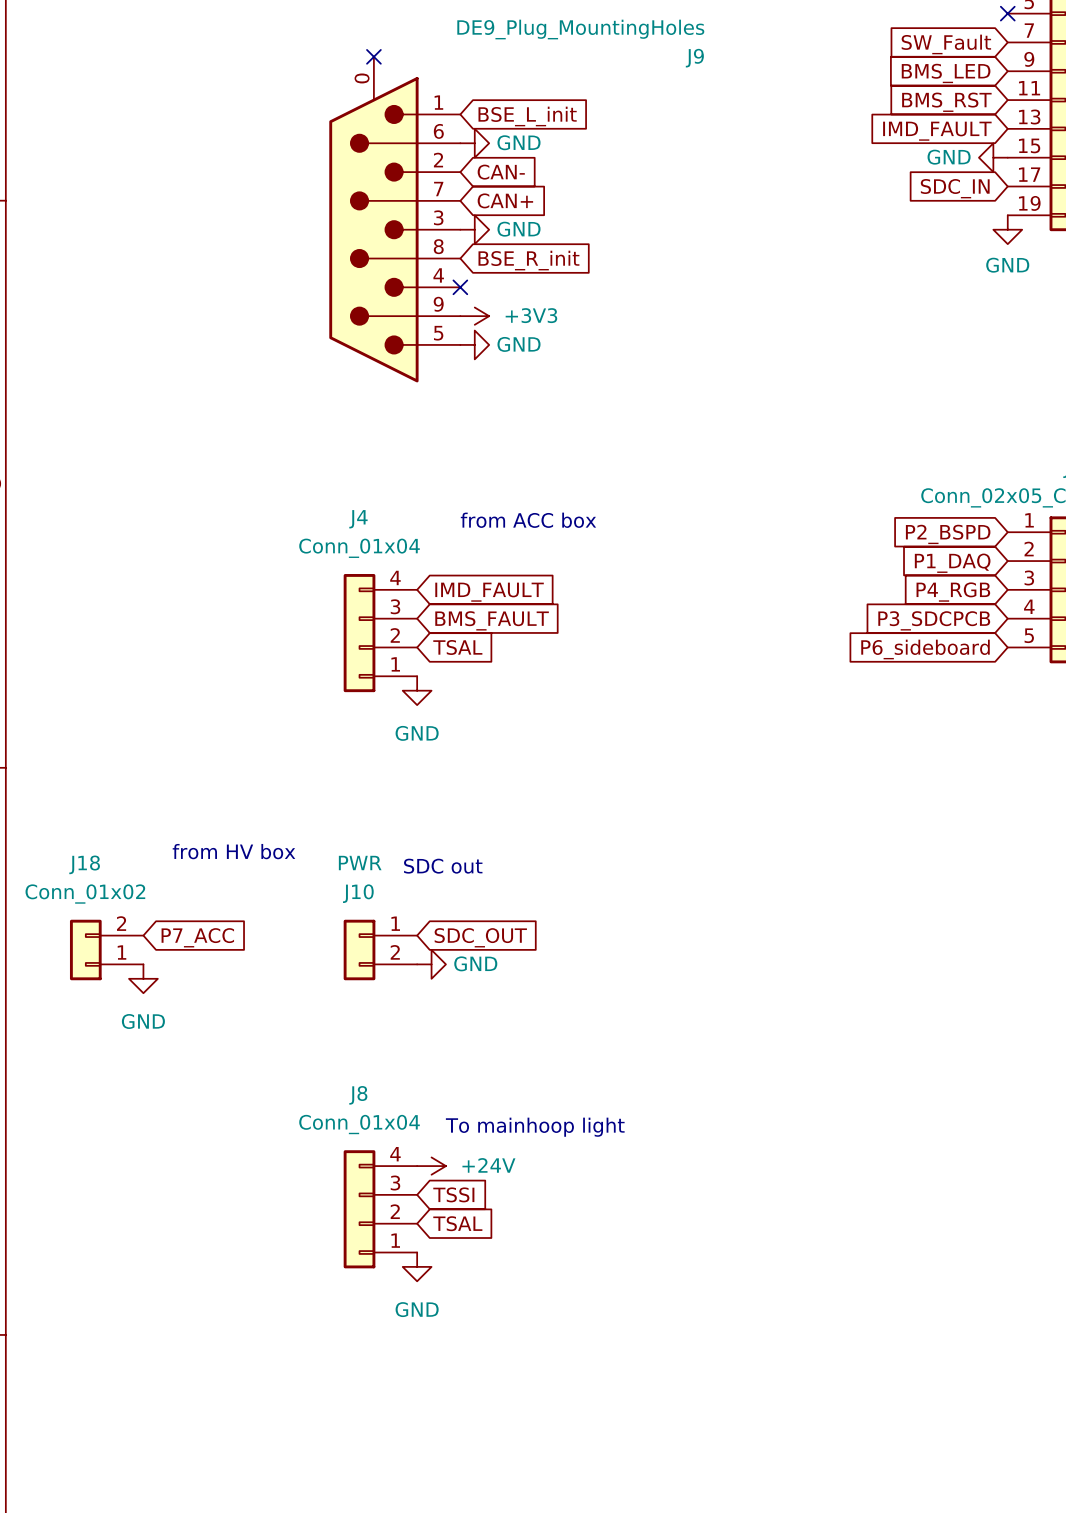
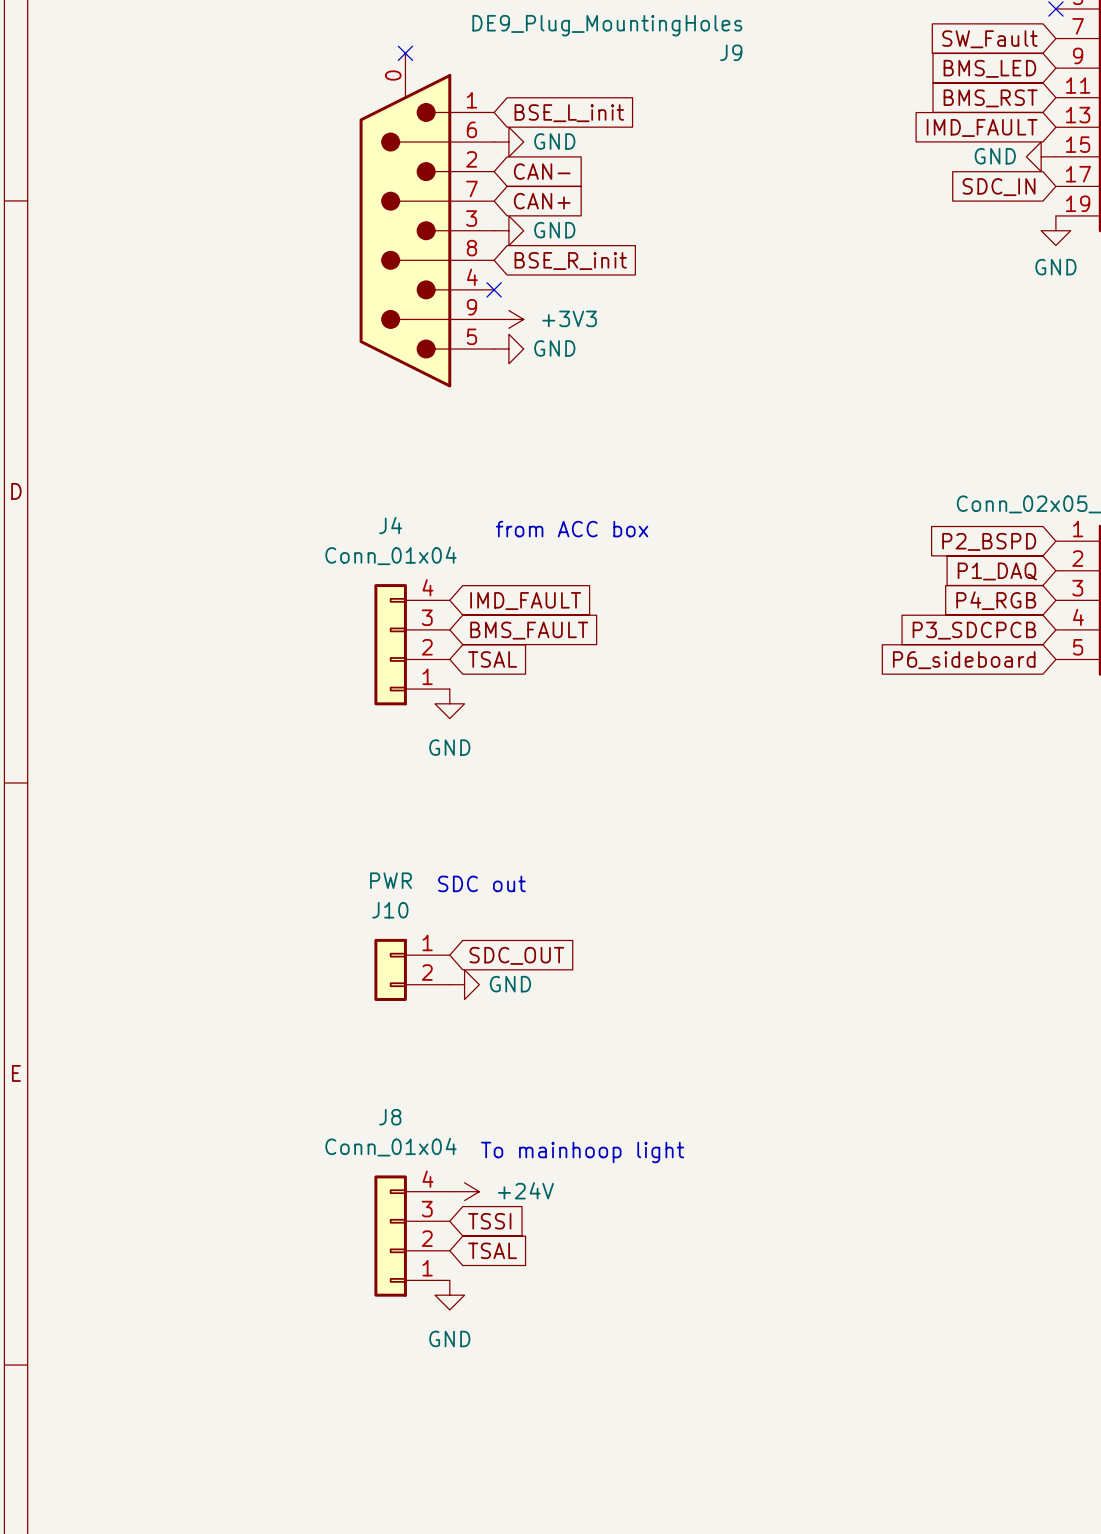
text: from HV box (233, 851) -> none
global label: P7_ACC (197, 937) -> none
J18: Conn_01x02 (106, 949) -> none
power symbol: GND (143, 978) -> none

